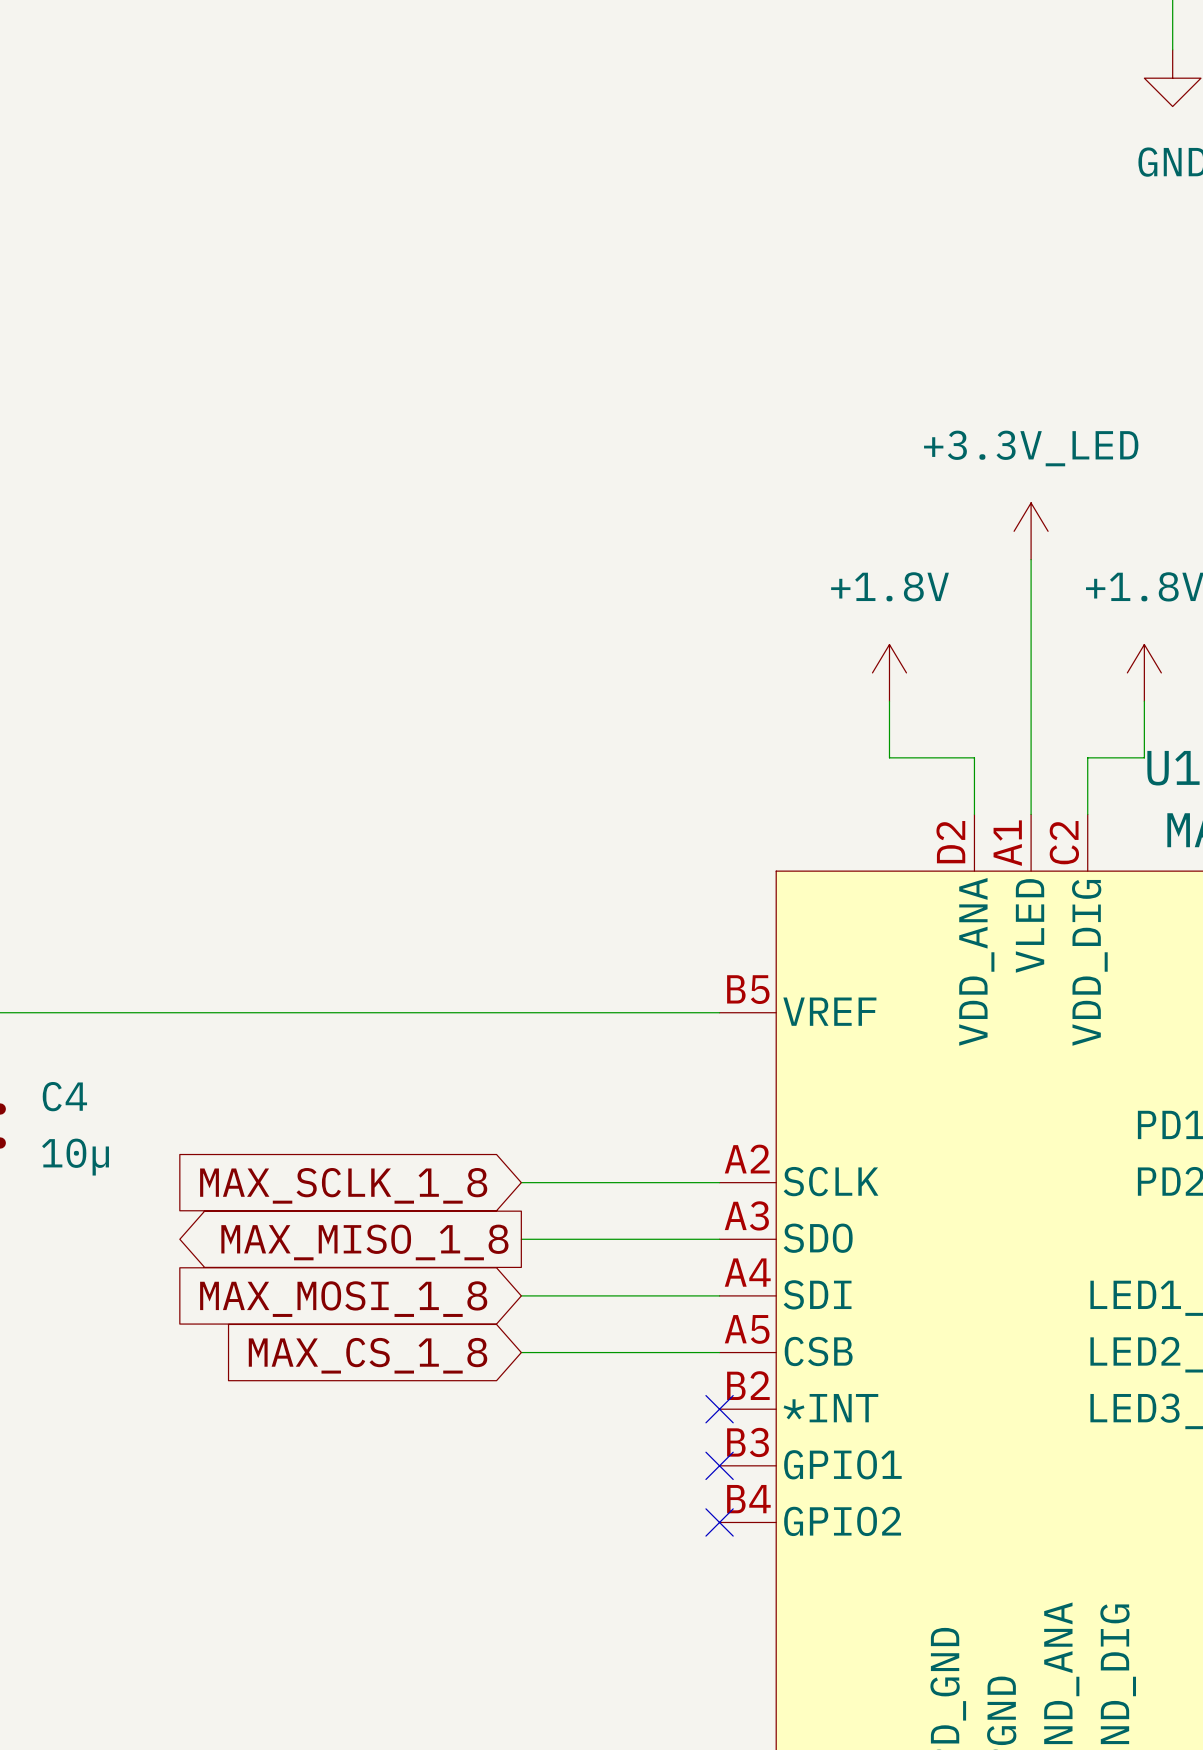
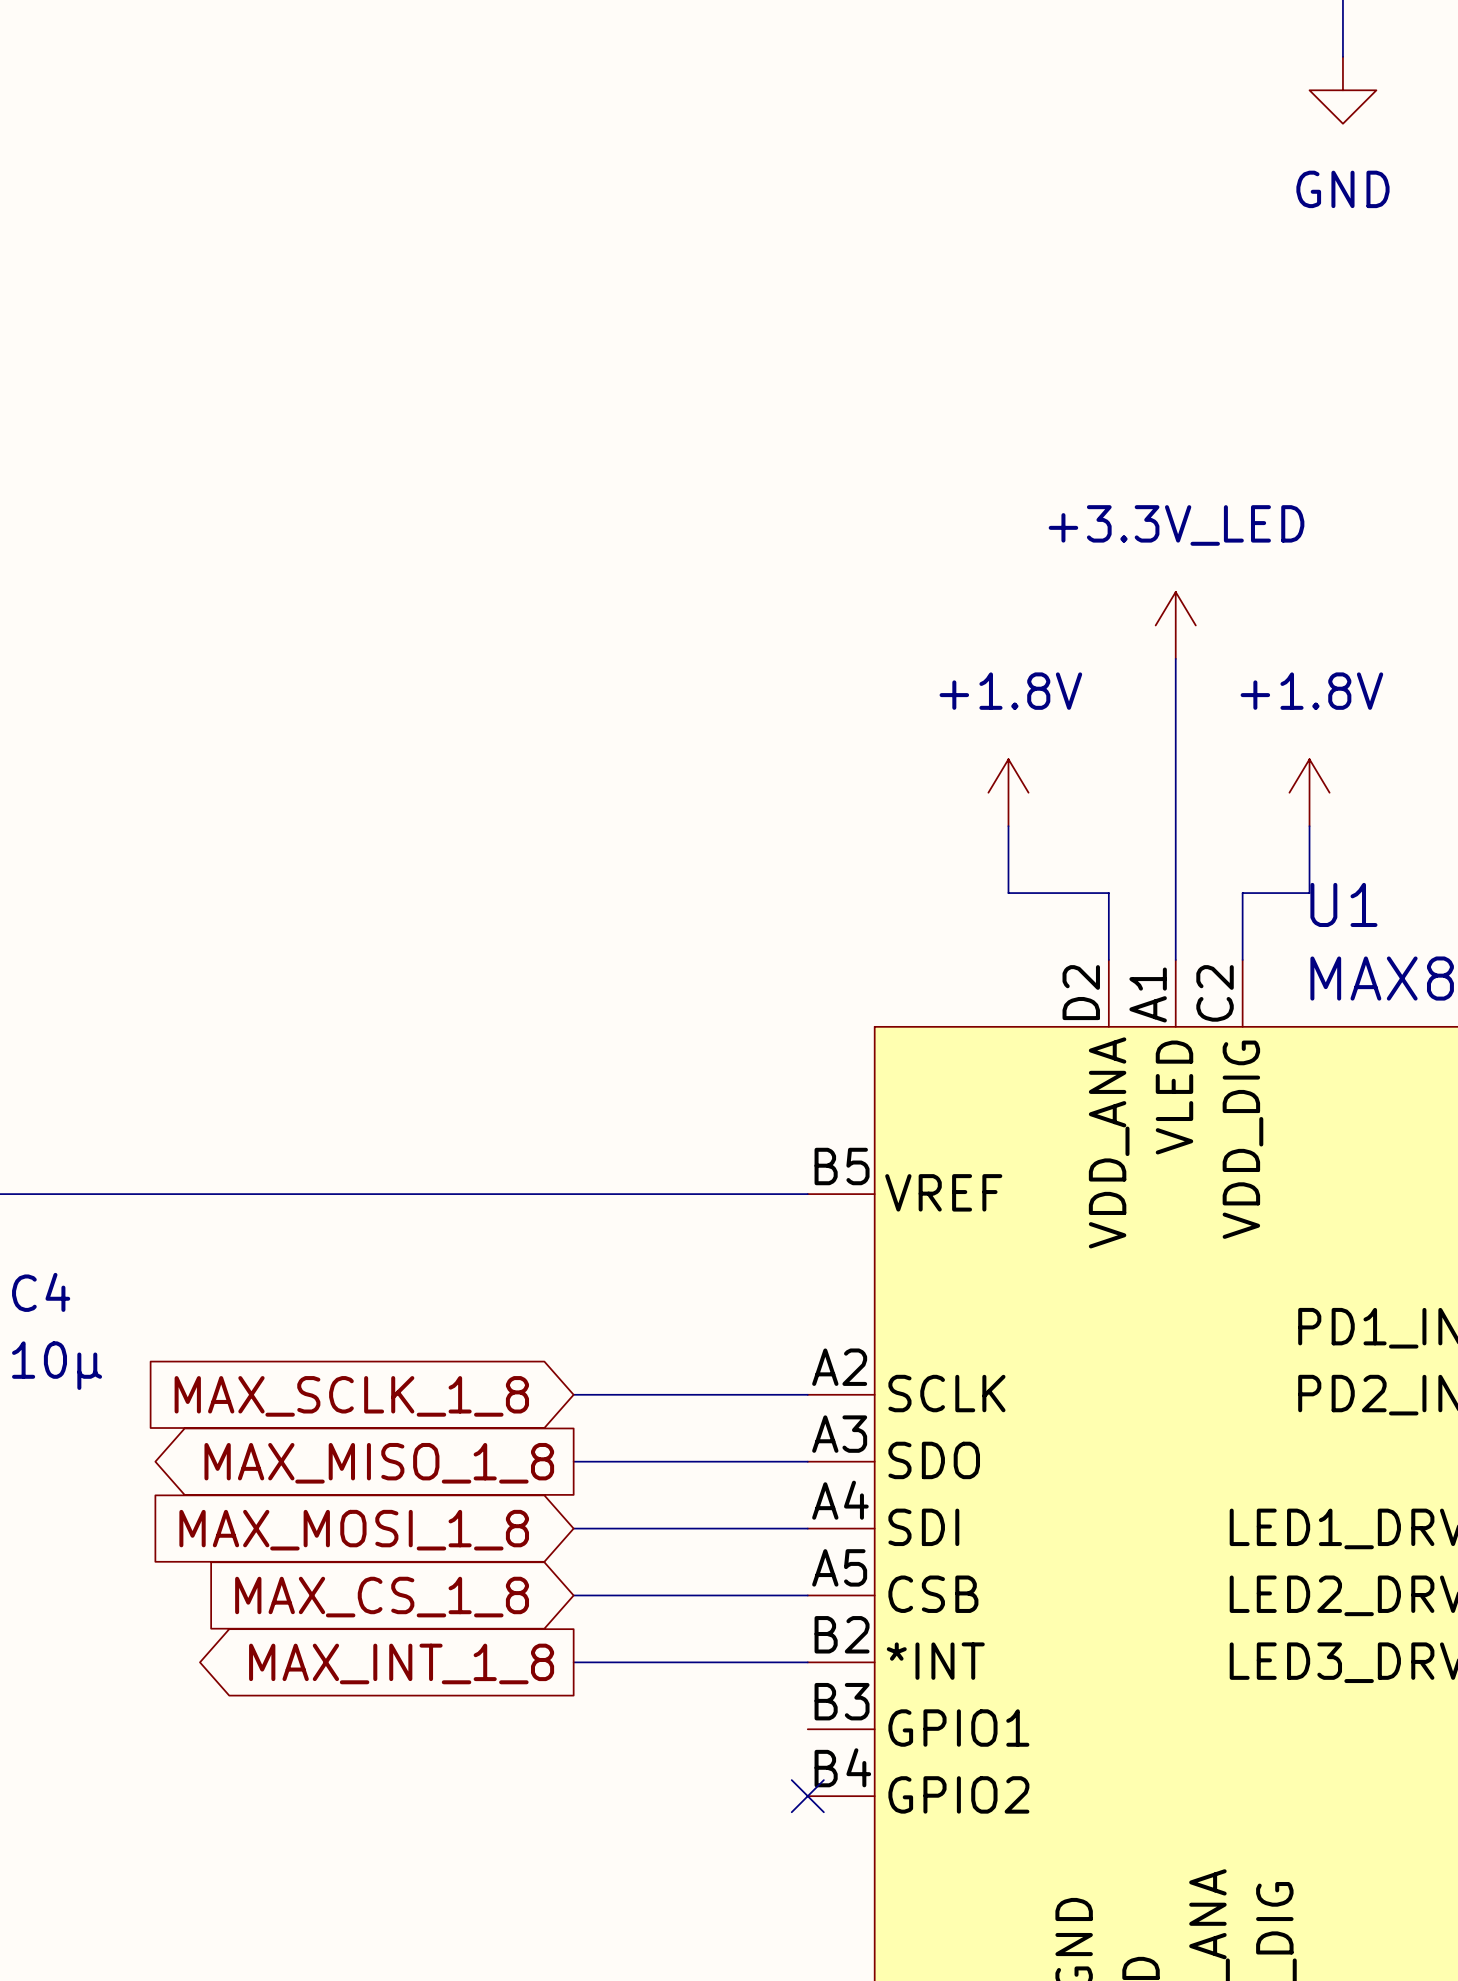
wire: none -> (573, 1662) (807, 1662)
no-connect mark: (719, 1409) -> none
global label: none -> MAX_INT_1_8 (401, 1663)
no-connect mark: (719, 1465) -> none

